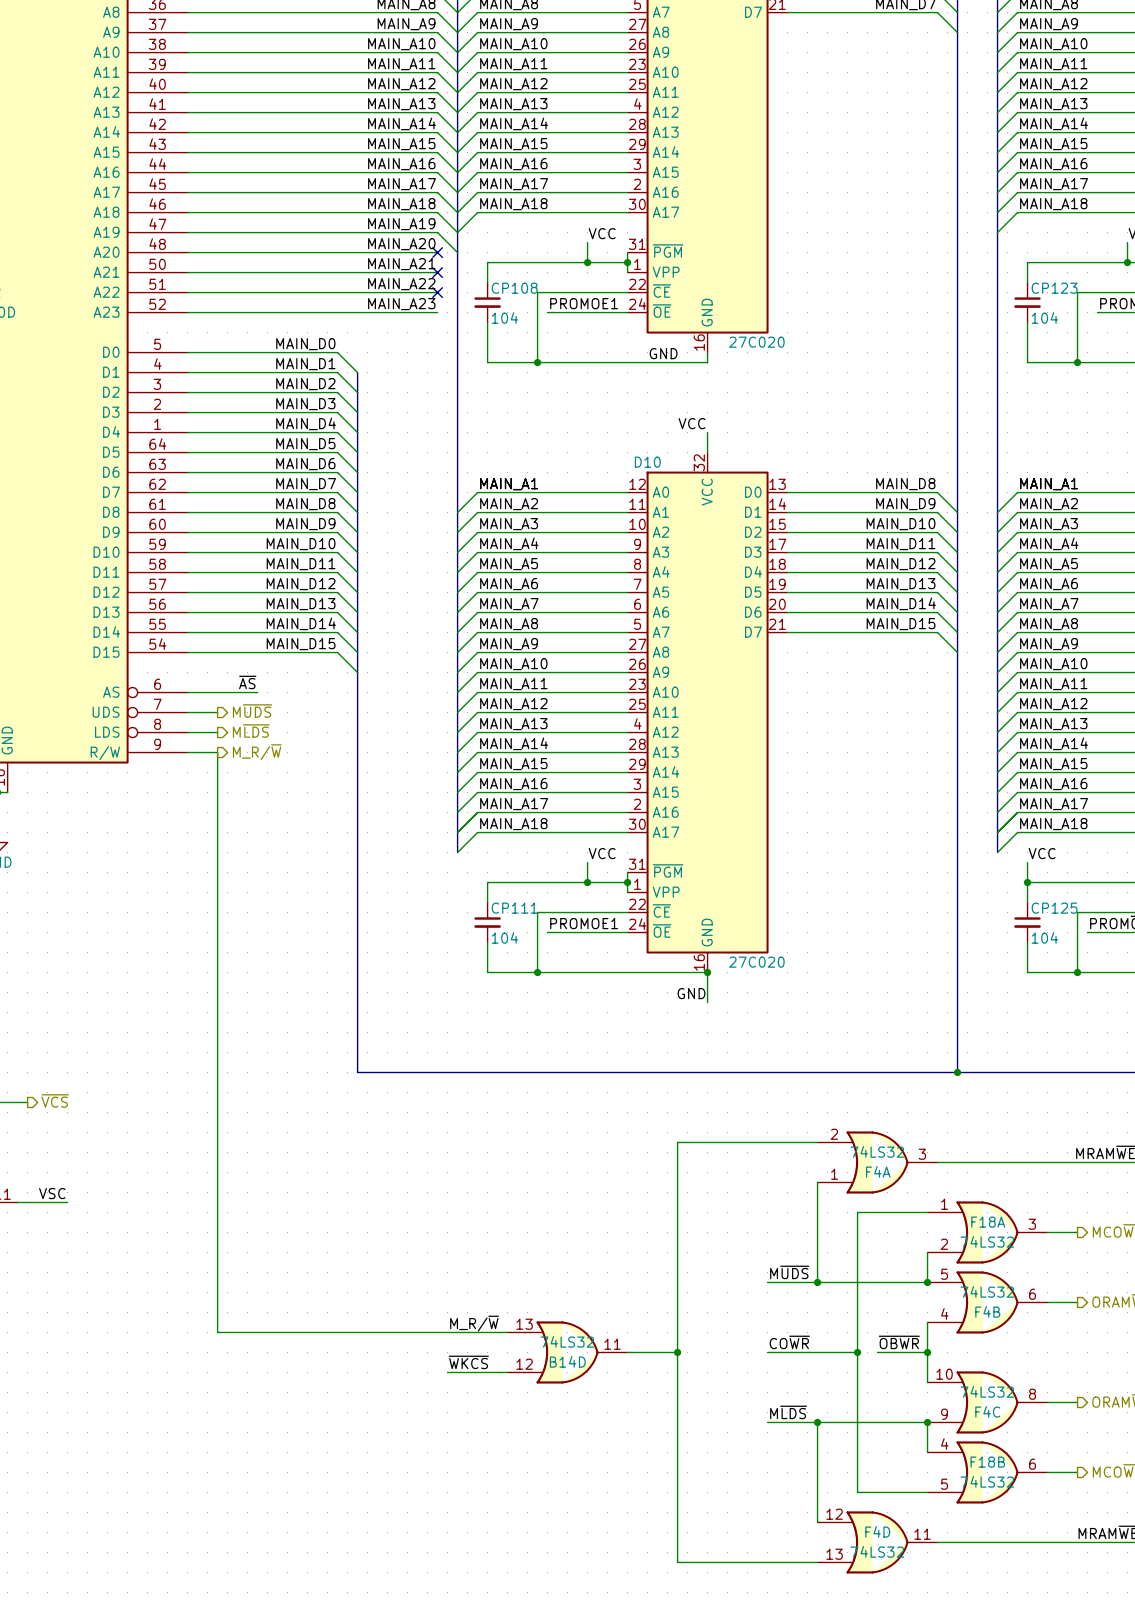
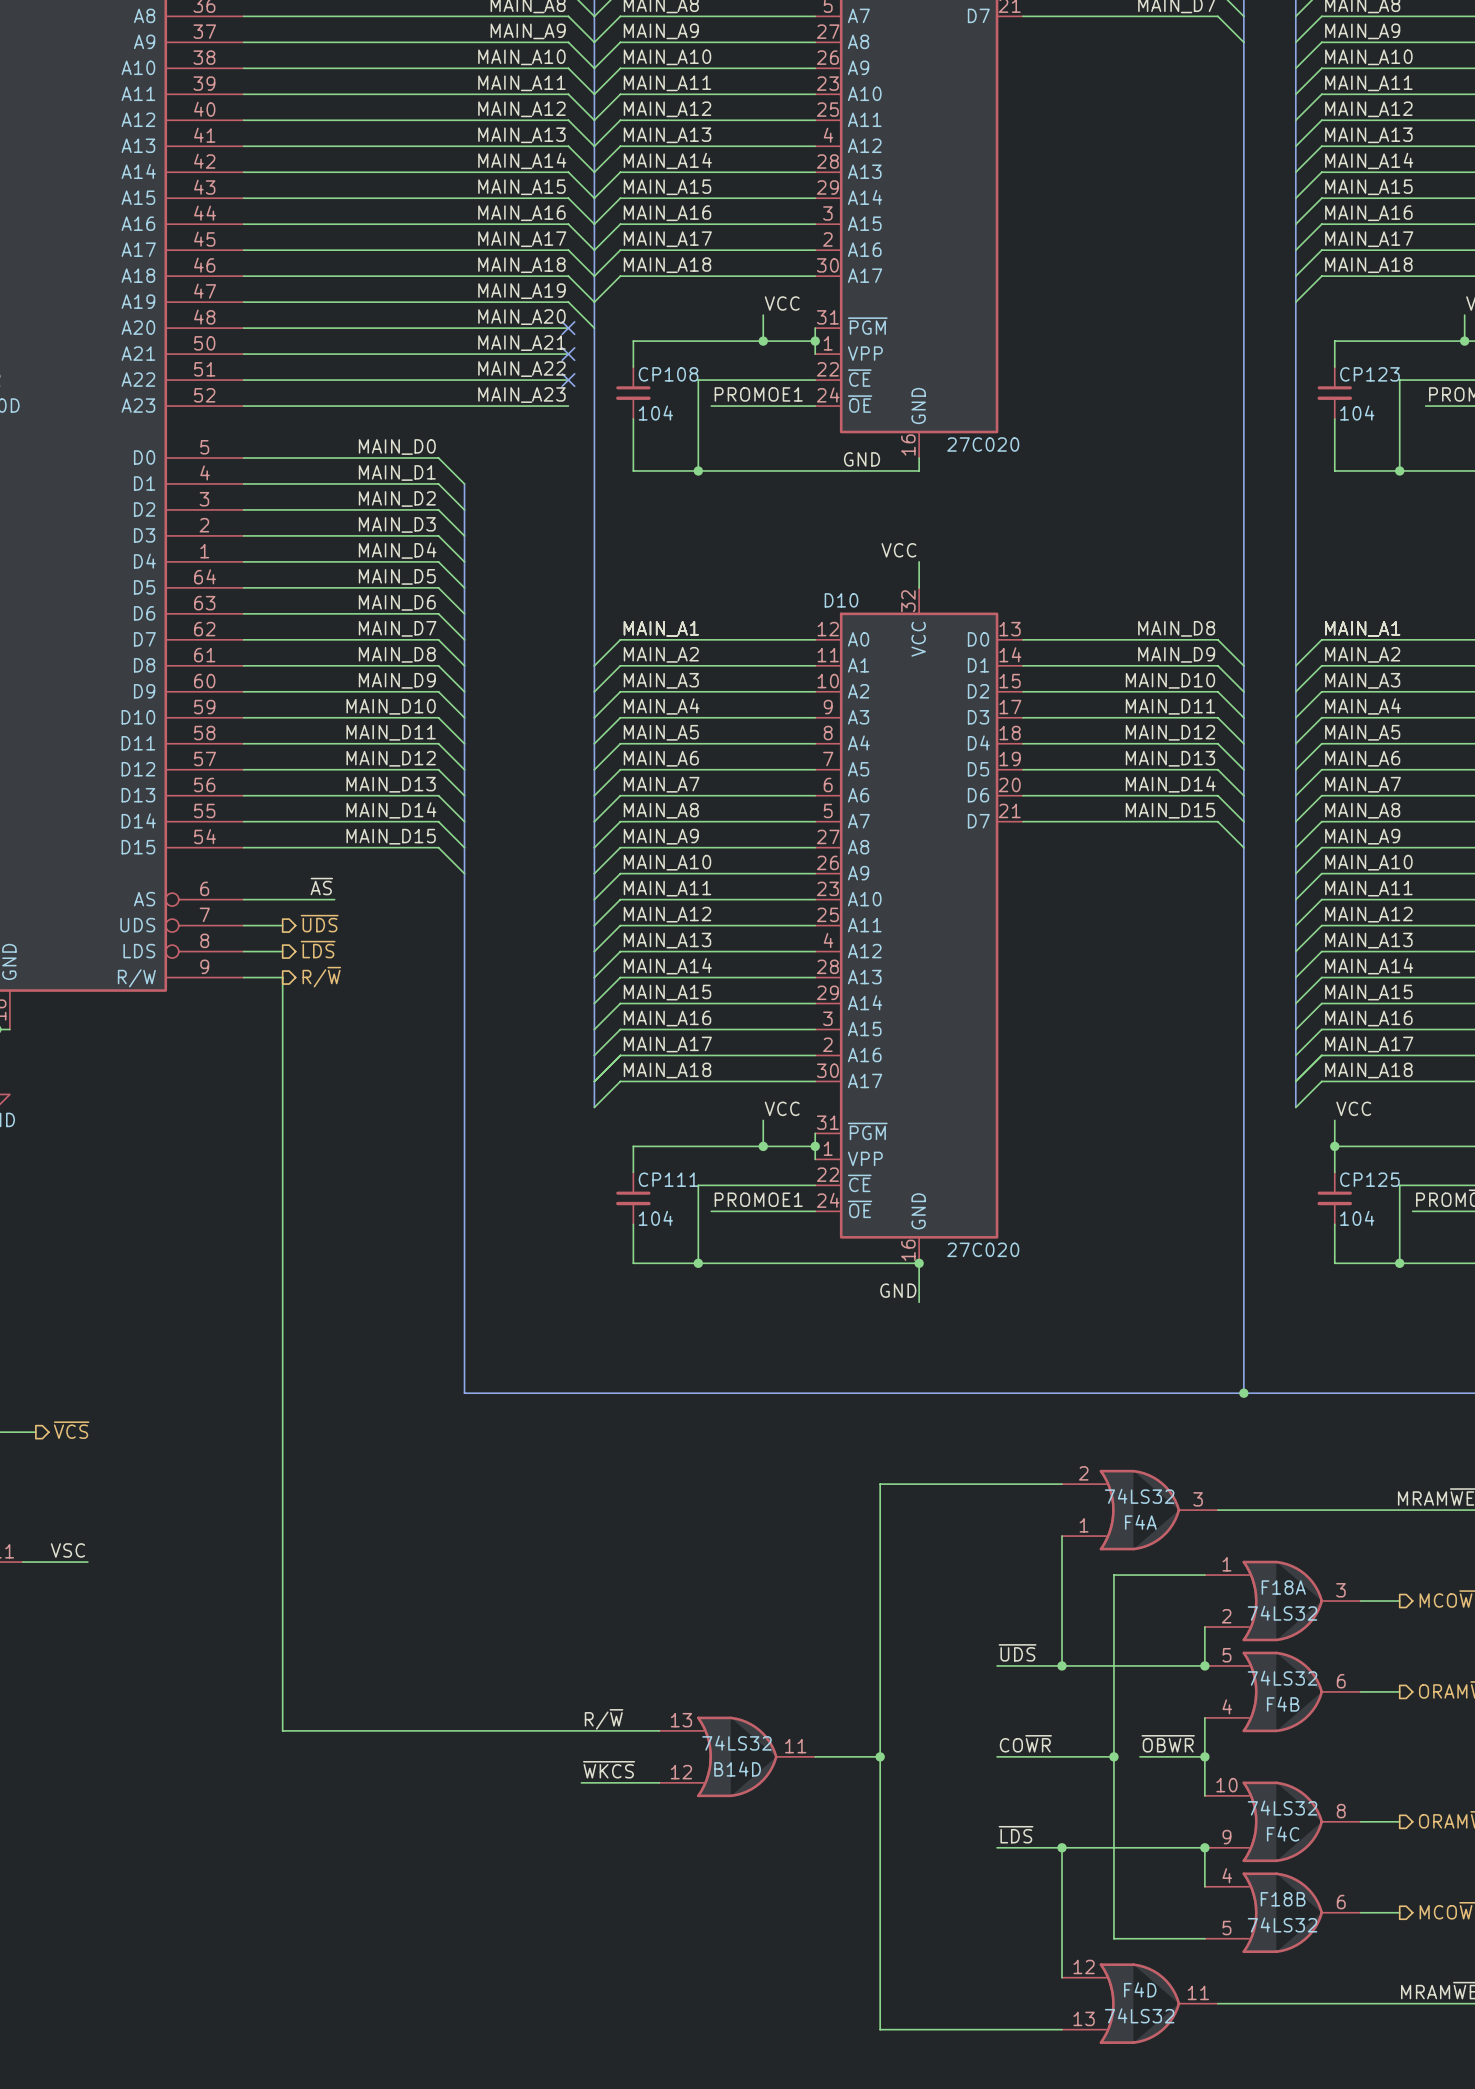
hierarchical label: M~{UDS} (252, 711) -> ~{UDS} (319, 923)
hierarchical label: M~{LDS} (251, 731) -> ~{LDS} (318, 949)
hierarchical label: M_R/~{W} (257, 752) -> R/~{W} (321, 977)
label: M~{UDS} (789, 1272) -> ~{UDS} (1017, 1652)
label: M_R/~{W} (474, 1323) -> R/~{W} (604, 1719)
label: M~{LDS} (788, 1412) -> ~{LDS} (1016, 1834)

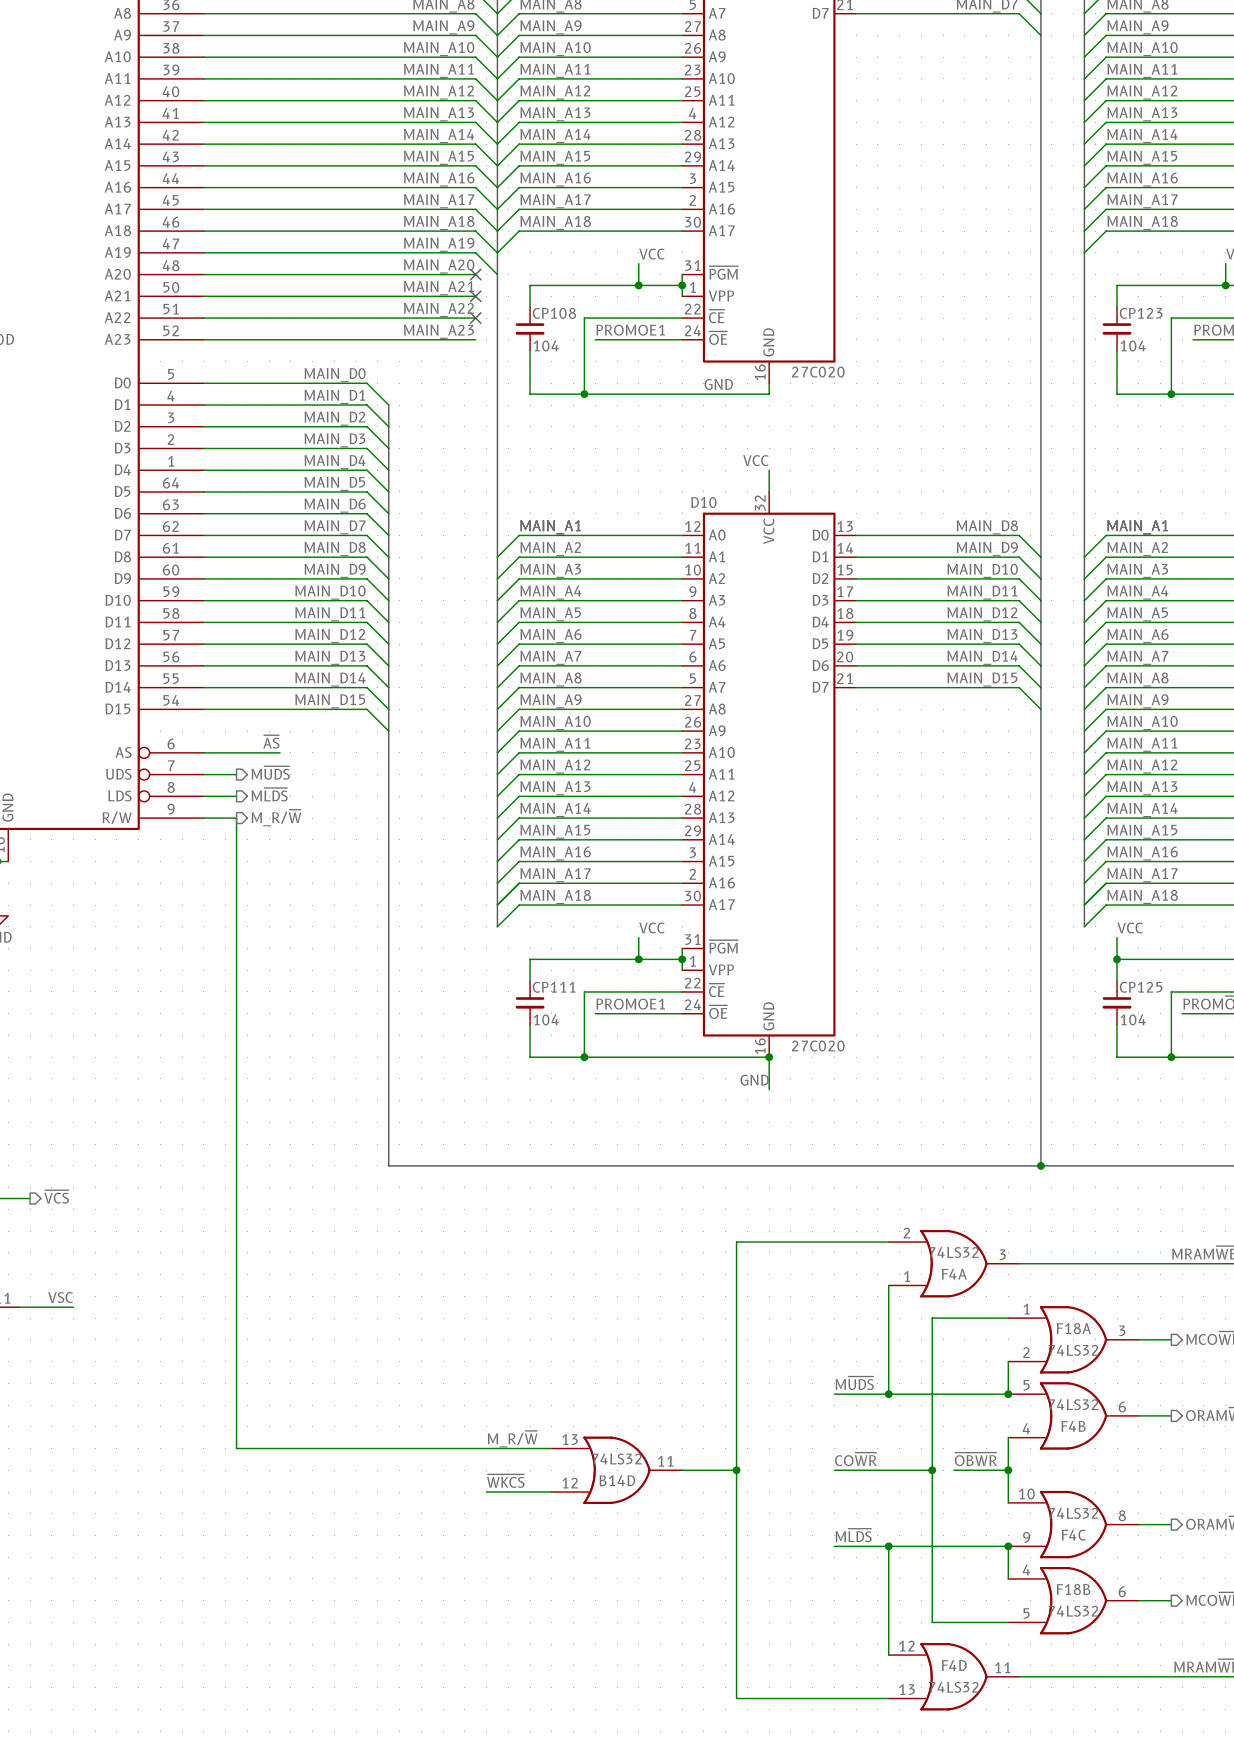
hierarchical label: ~{UDS} (319, 923) -> M~{UDS} (270, 772)
hierarchical label: ~{LDS} (318, 949) -> M~{LDS} (269, 794)
hierarchical label: R/~{W} (321, 977) -> M_R/~{W} (276, 818)
label: ~{UDS} (1017, 1652) -> M~{UDS} (854, 1383)
label: R/~{W} (604, 1719) -> M_R/~{W} (512, 1439)
label: ~{LDS} (1016, 1834) -> M~{LDS} (853, 1535)

